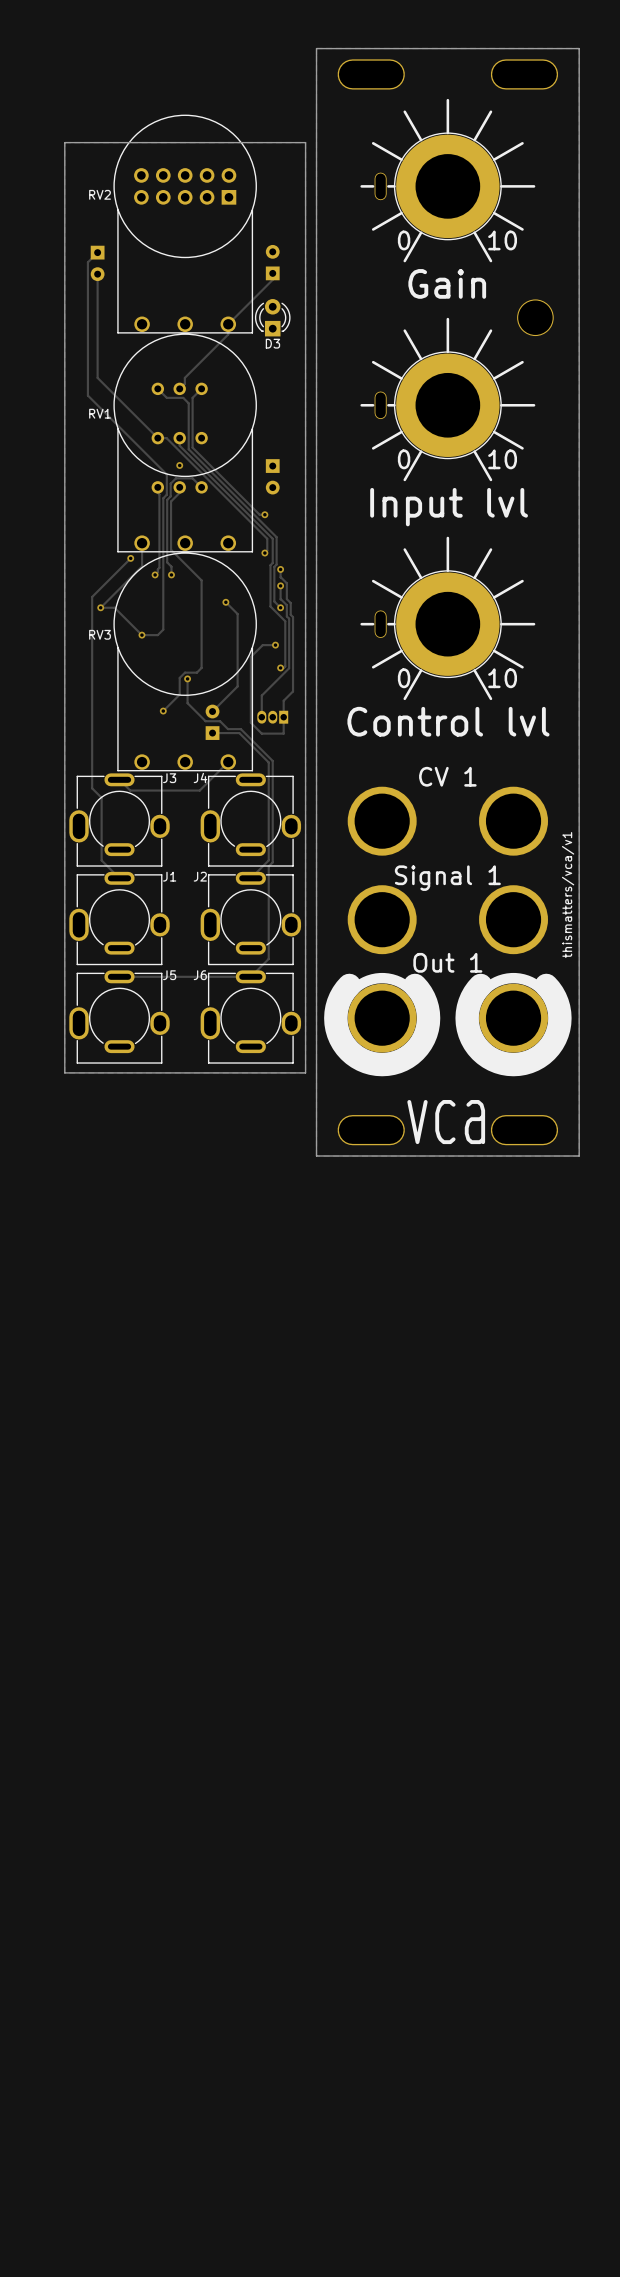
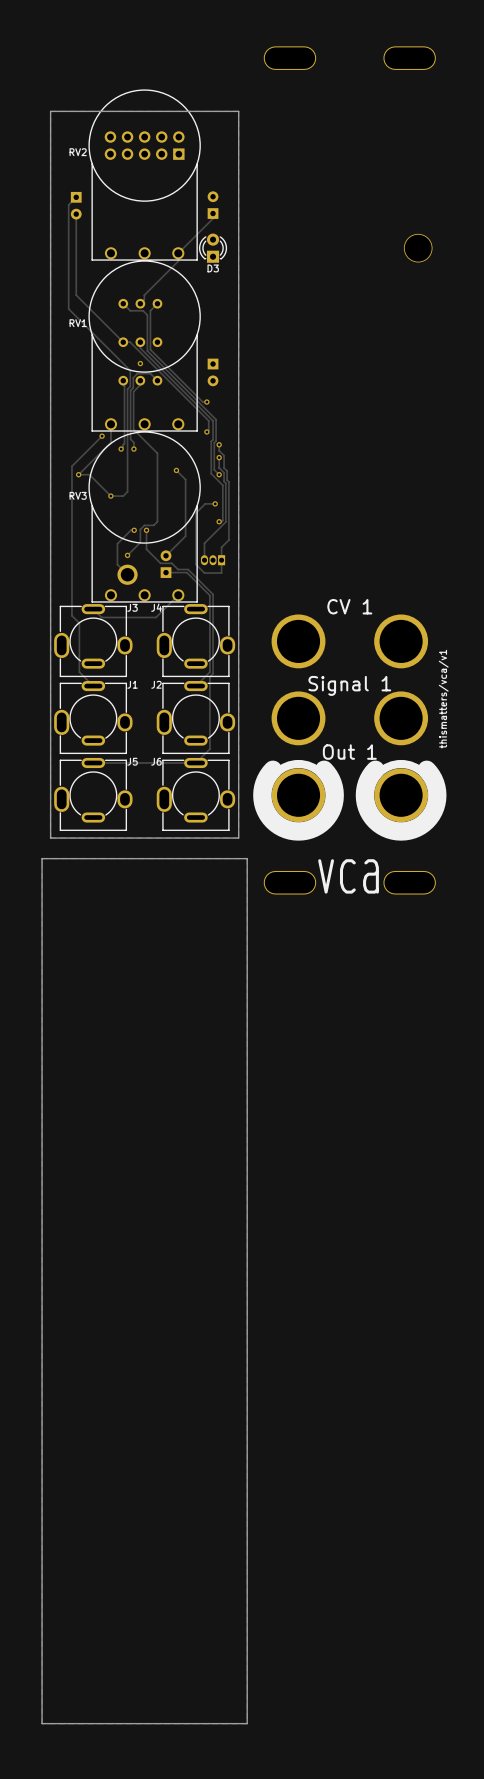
part: Gain (447, 180) -> none
part: Input lvl (447, 399) -> none
part: Control lvl (447, 618) -> none
track: none -> (134, 530) (130, 530) (117, 543) (117, 564) (127, 574)
via: none -> (134, 530)
part: none -> (127, 574)
board edge: (316, 1099) (316, 48) (579, 48) (579, 1155) (316, 1155) -> (247, 858) (42, 858) (42, 1723) (247, 1723) (247, 902)

